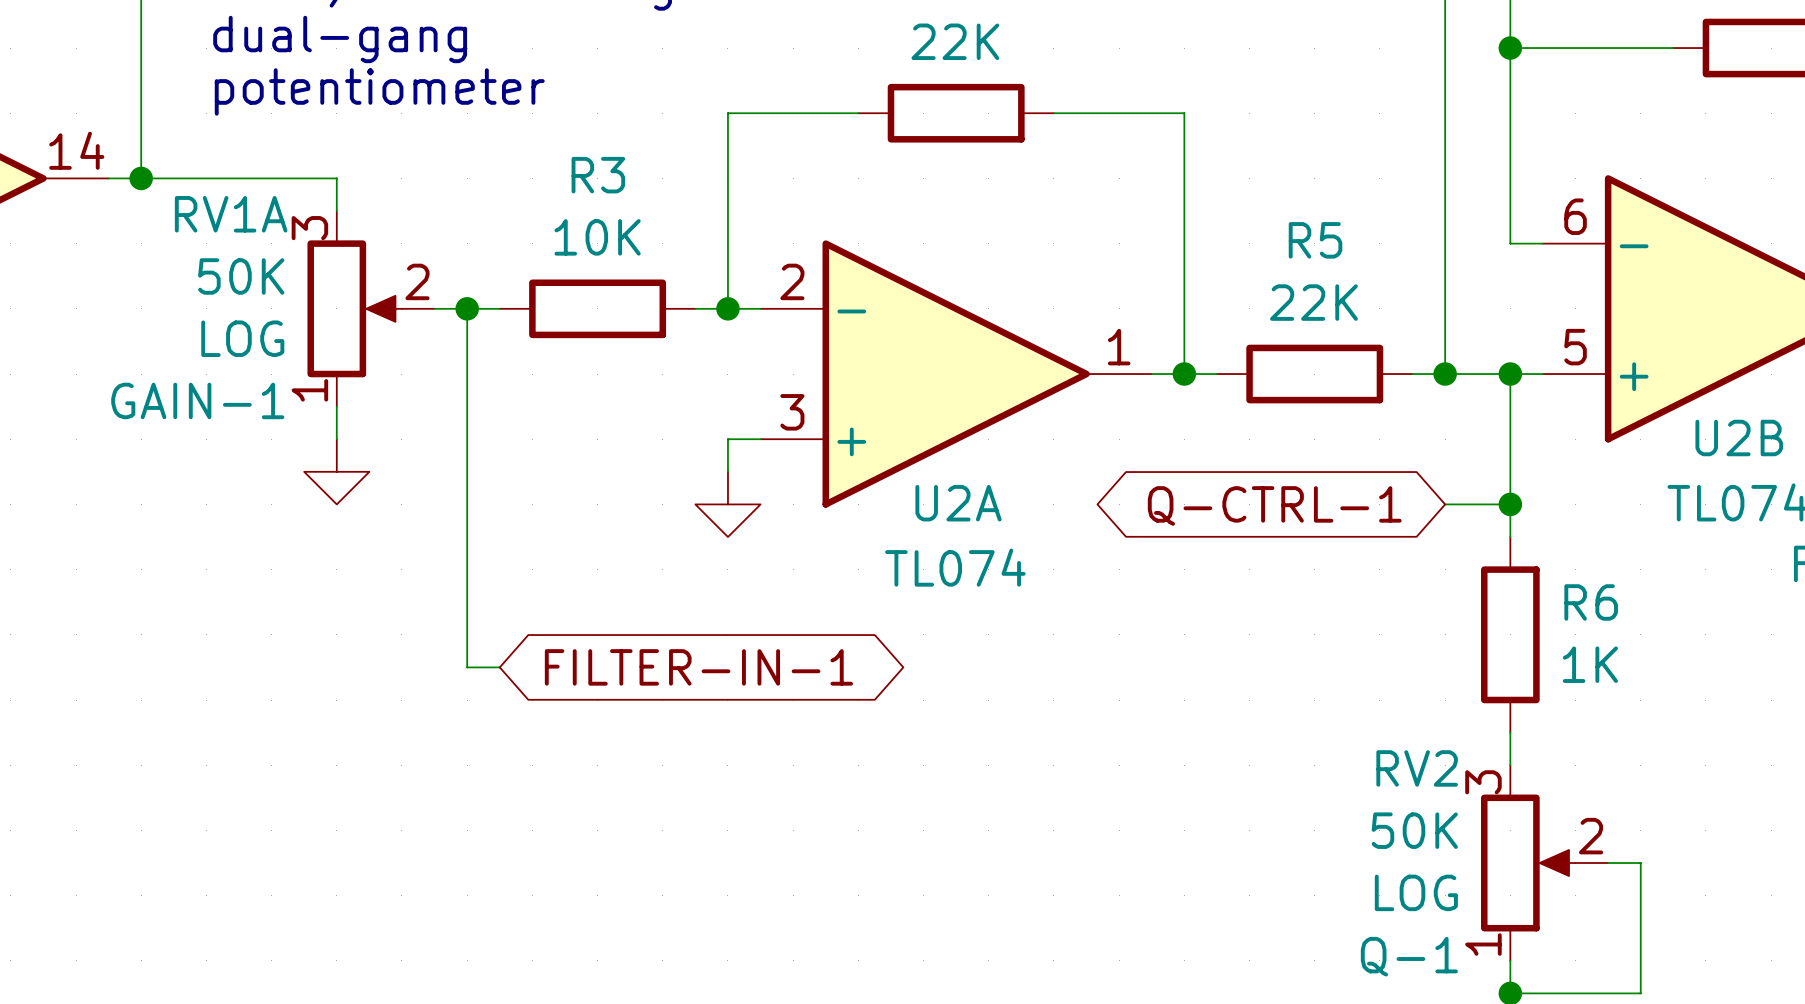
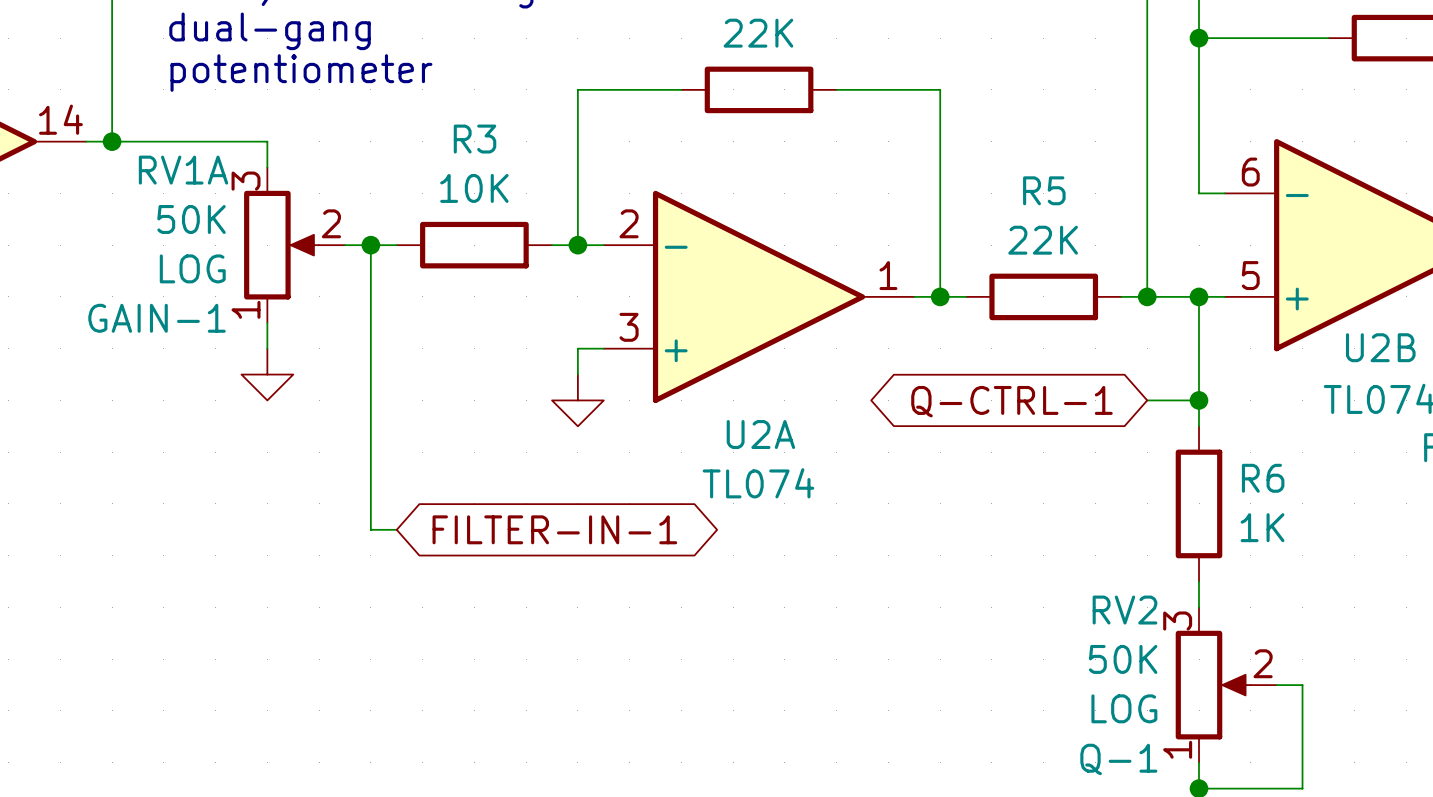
U2A name position: U2A (958, 503) -> U2A (760, 434)
U2A value position: TL074 (955, 567) -> TL074 (758, 483)

